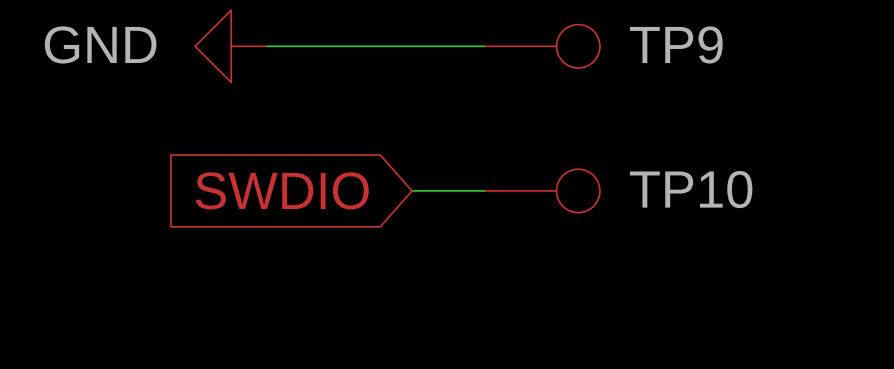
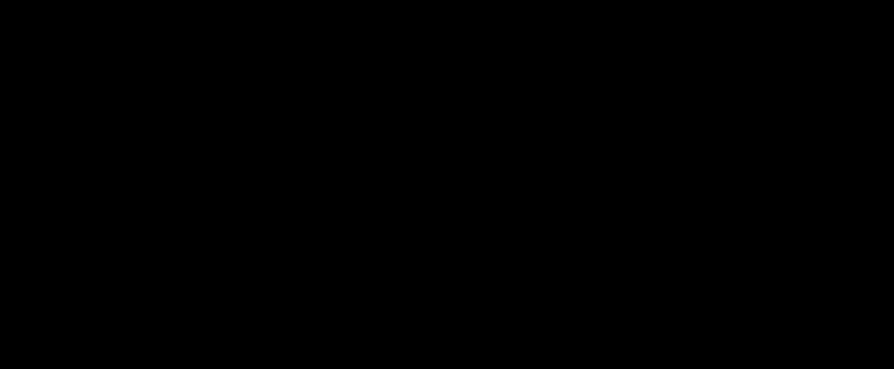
power symbol: GND (231, 46) -> none
wire: (267, 46) (484, 46) -> none
TP9: (542, 46) -> none
global label: SWDIO (282, 190) -> none
wire: (411, 190) (484, 190) -> none
TP10: (542, 190) -> none

